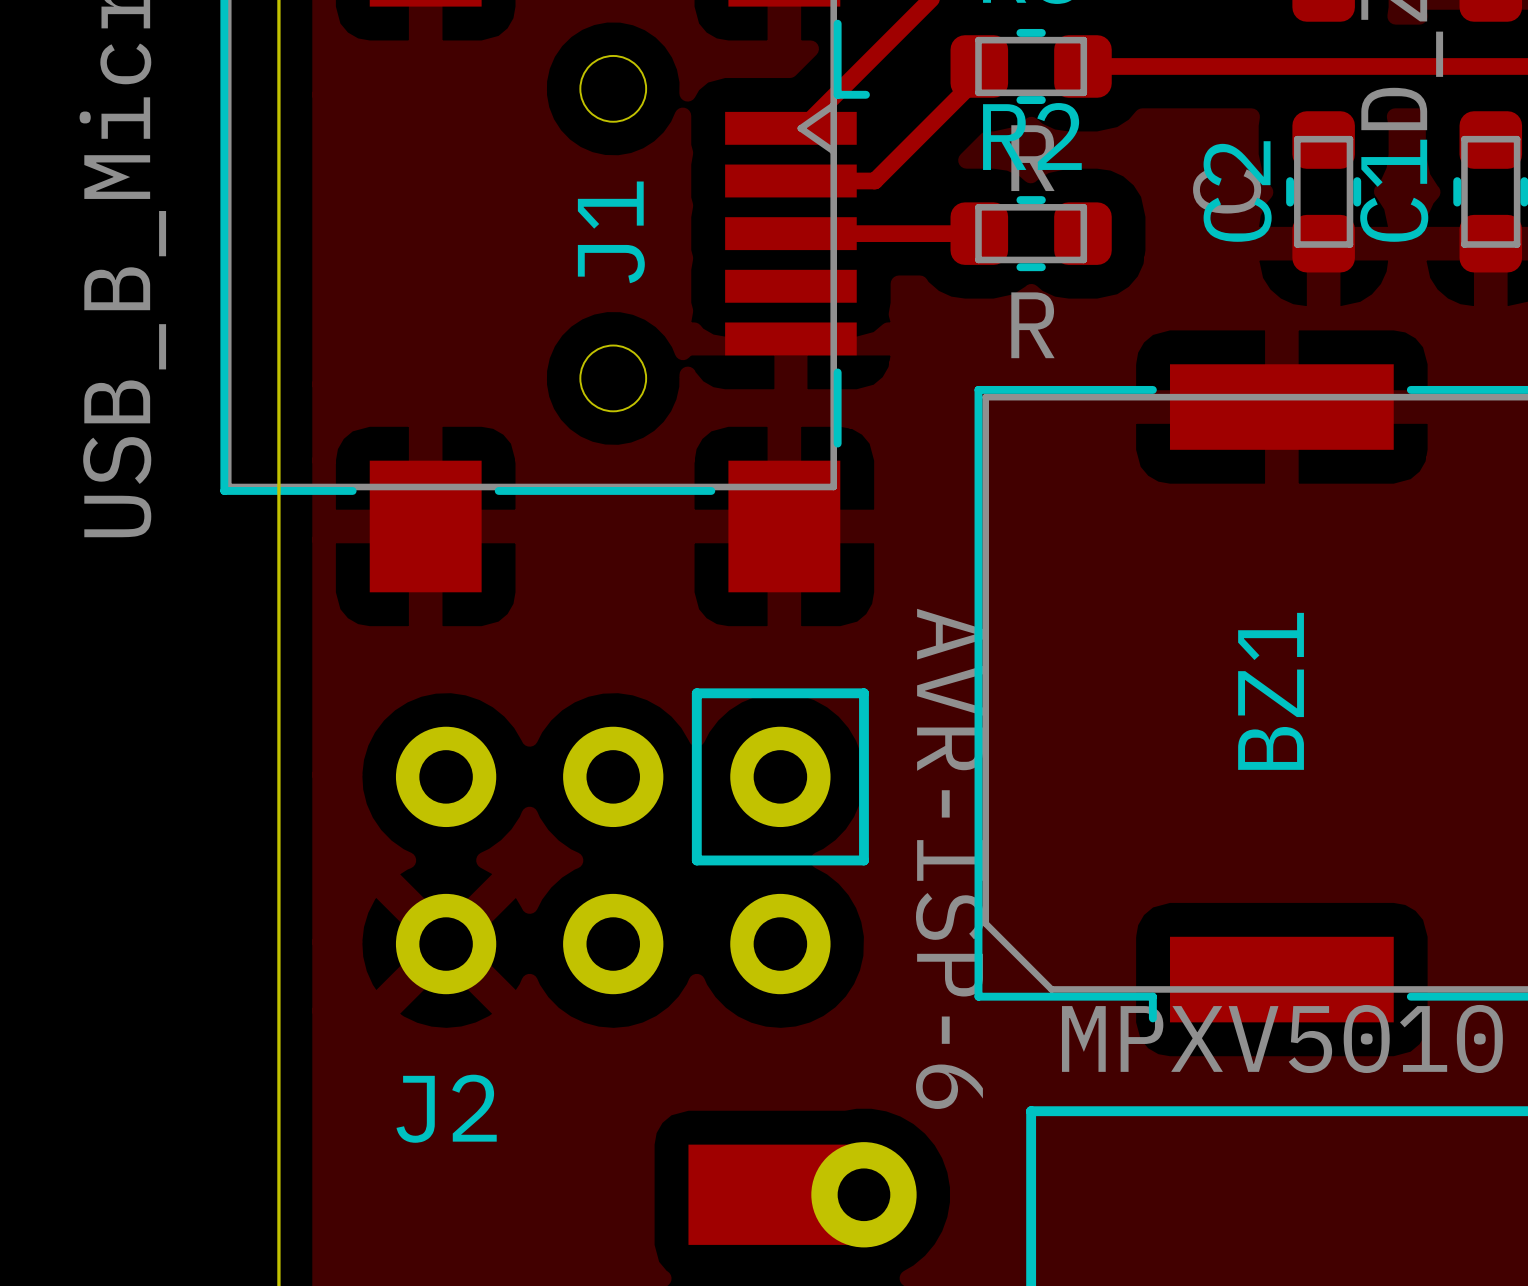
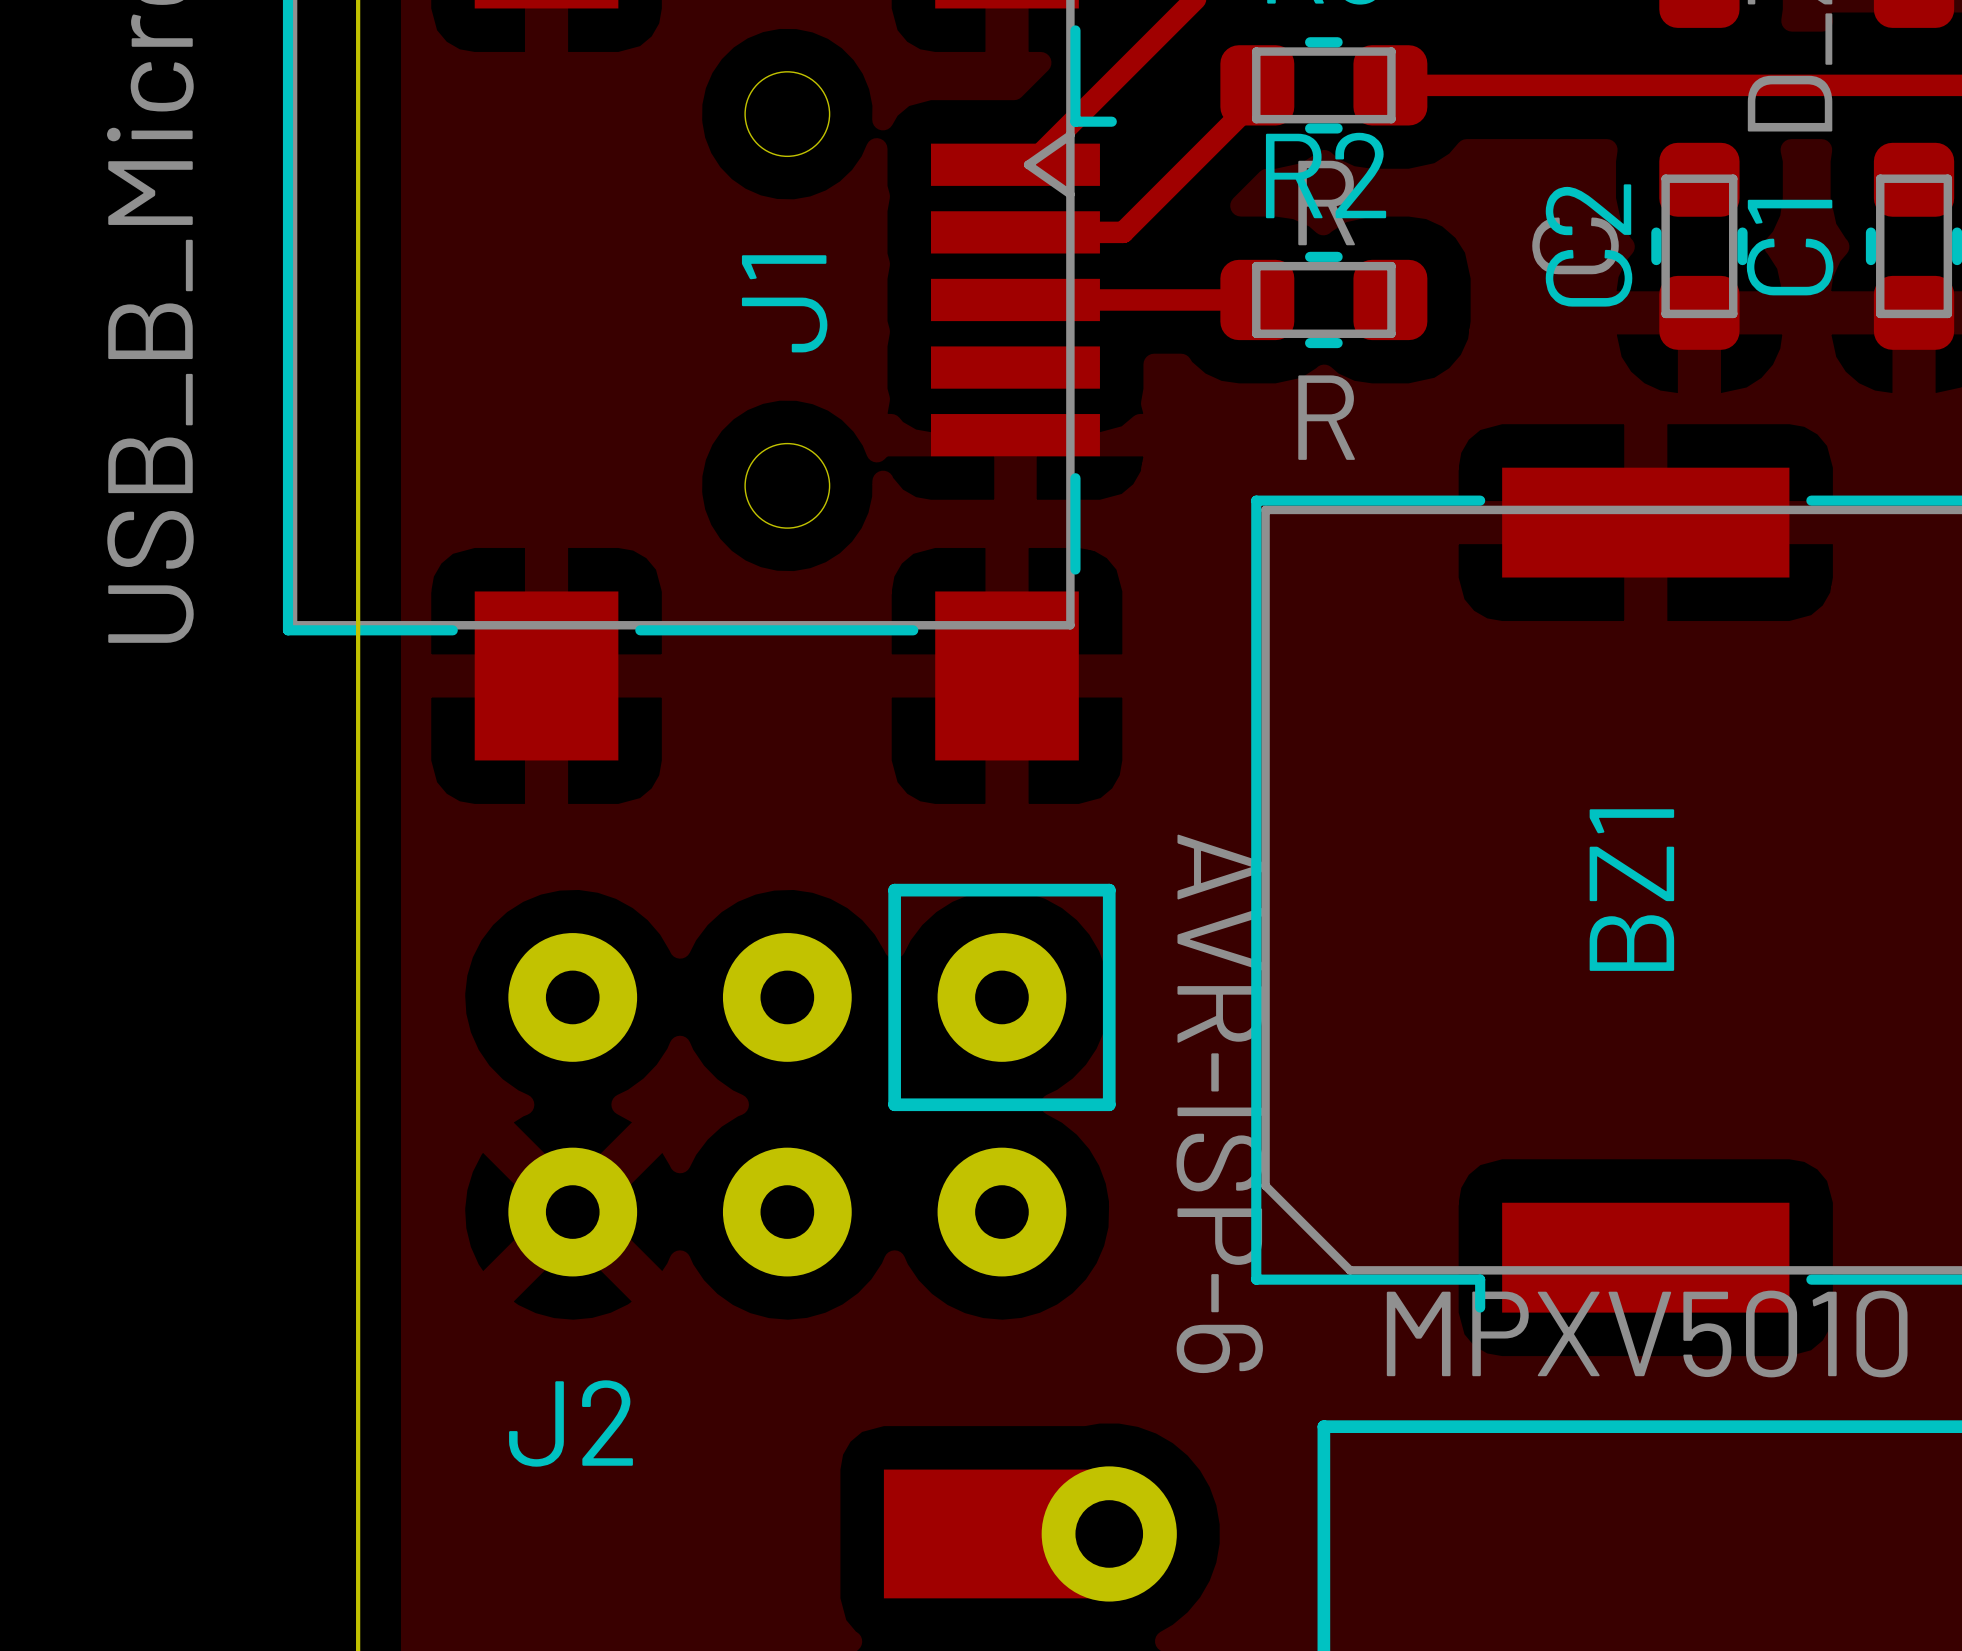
J2 footprint: [395, 688, 869, 995] -> [508, 883, 1116, 1277]

